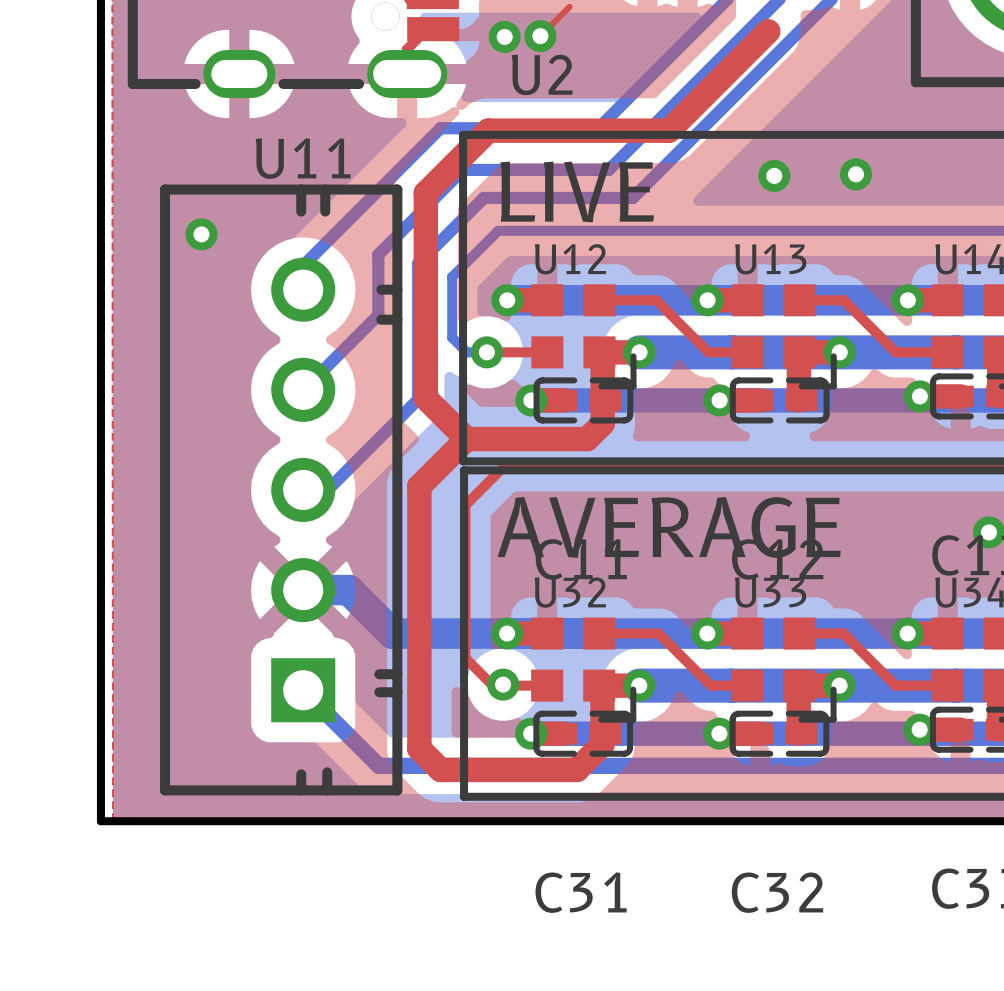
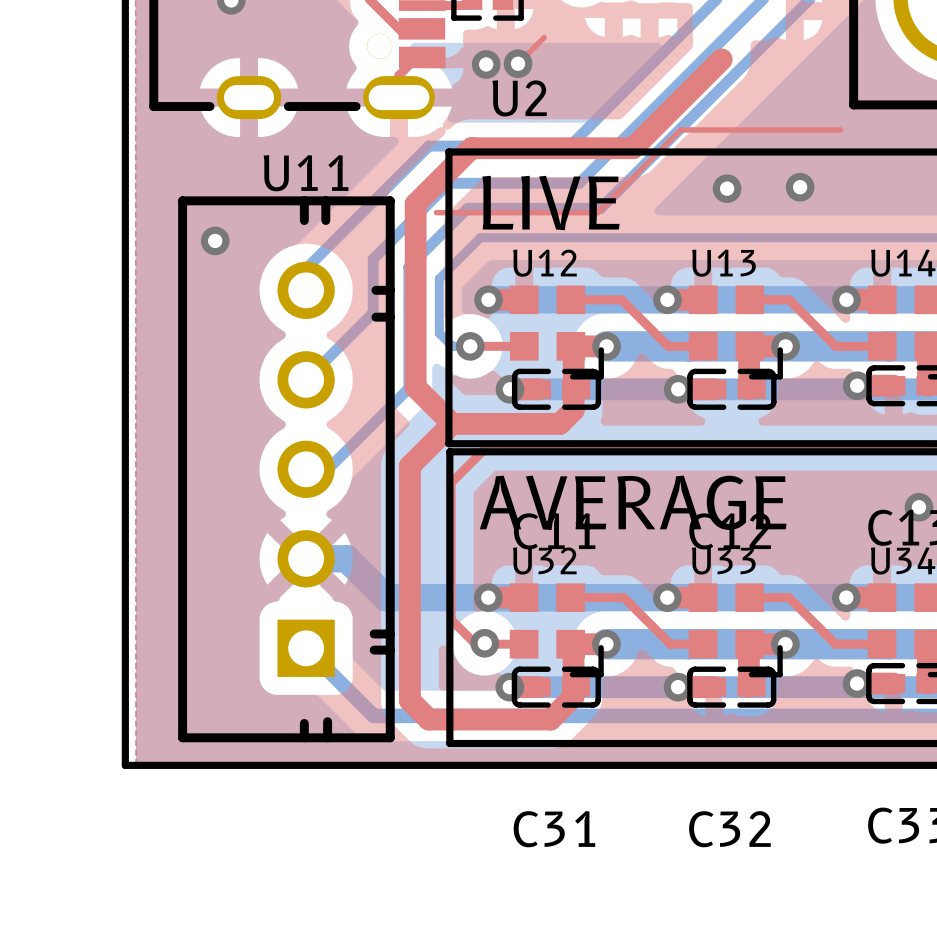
top track: none -> (840, 129) (680, 129) (597, 212) (436, 212)

